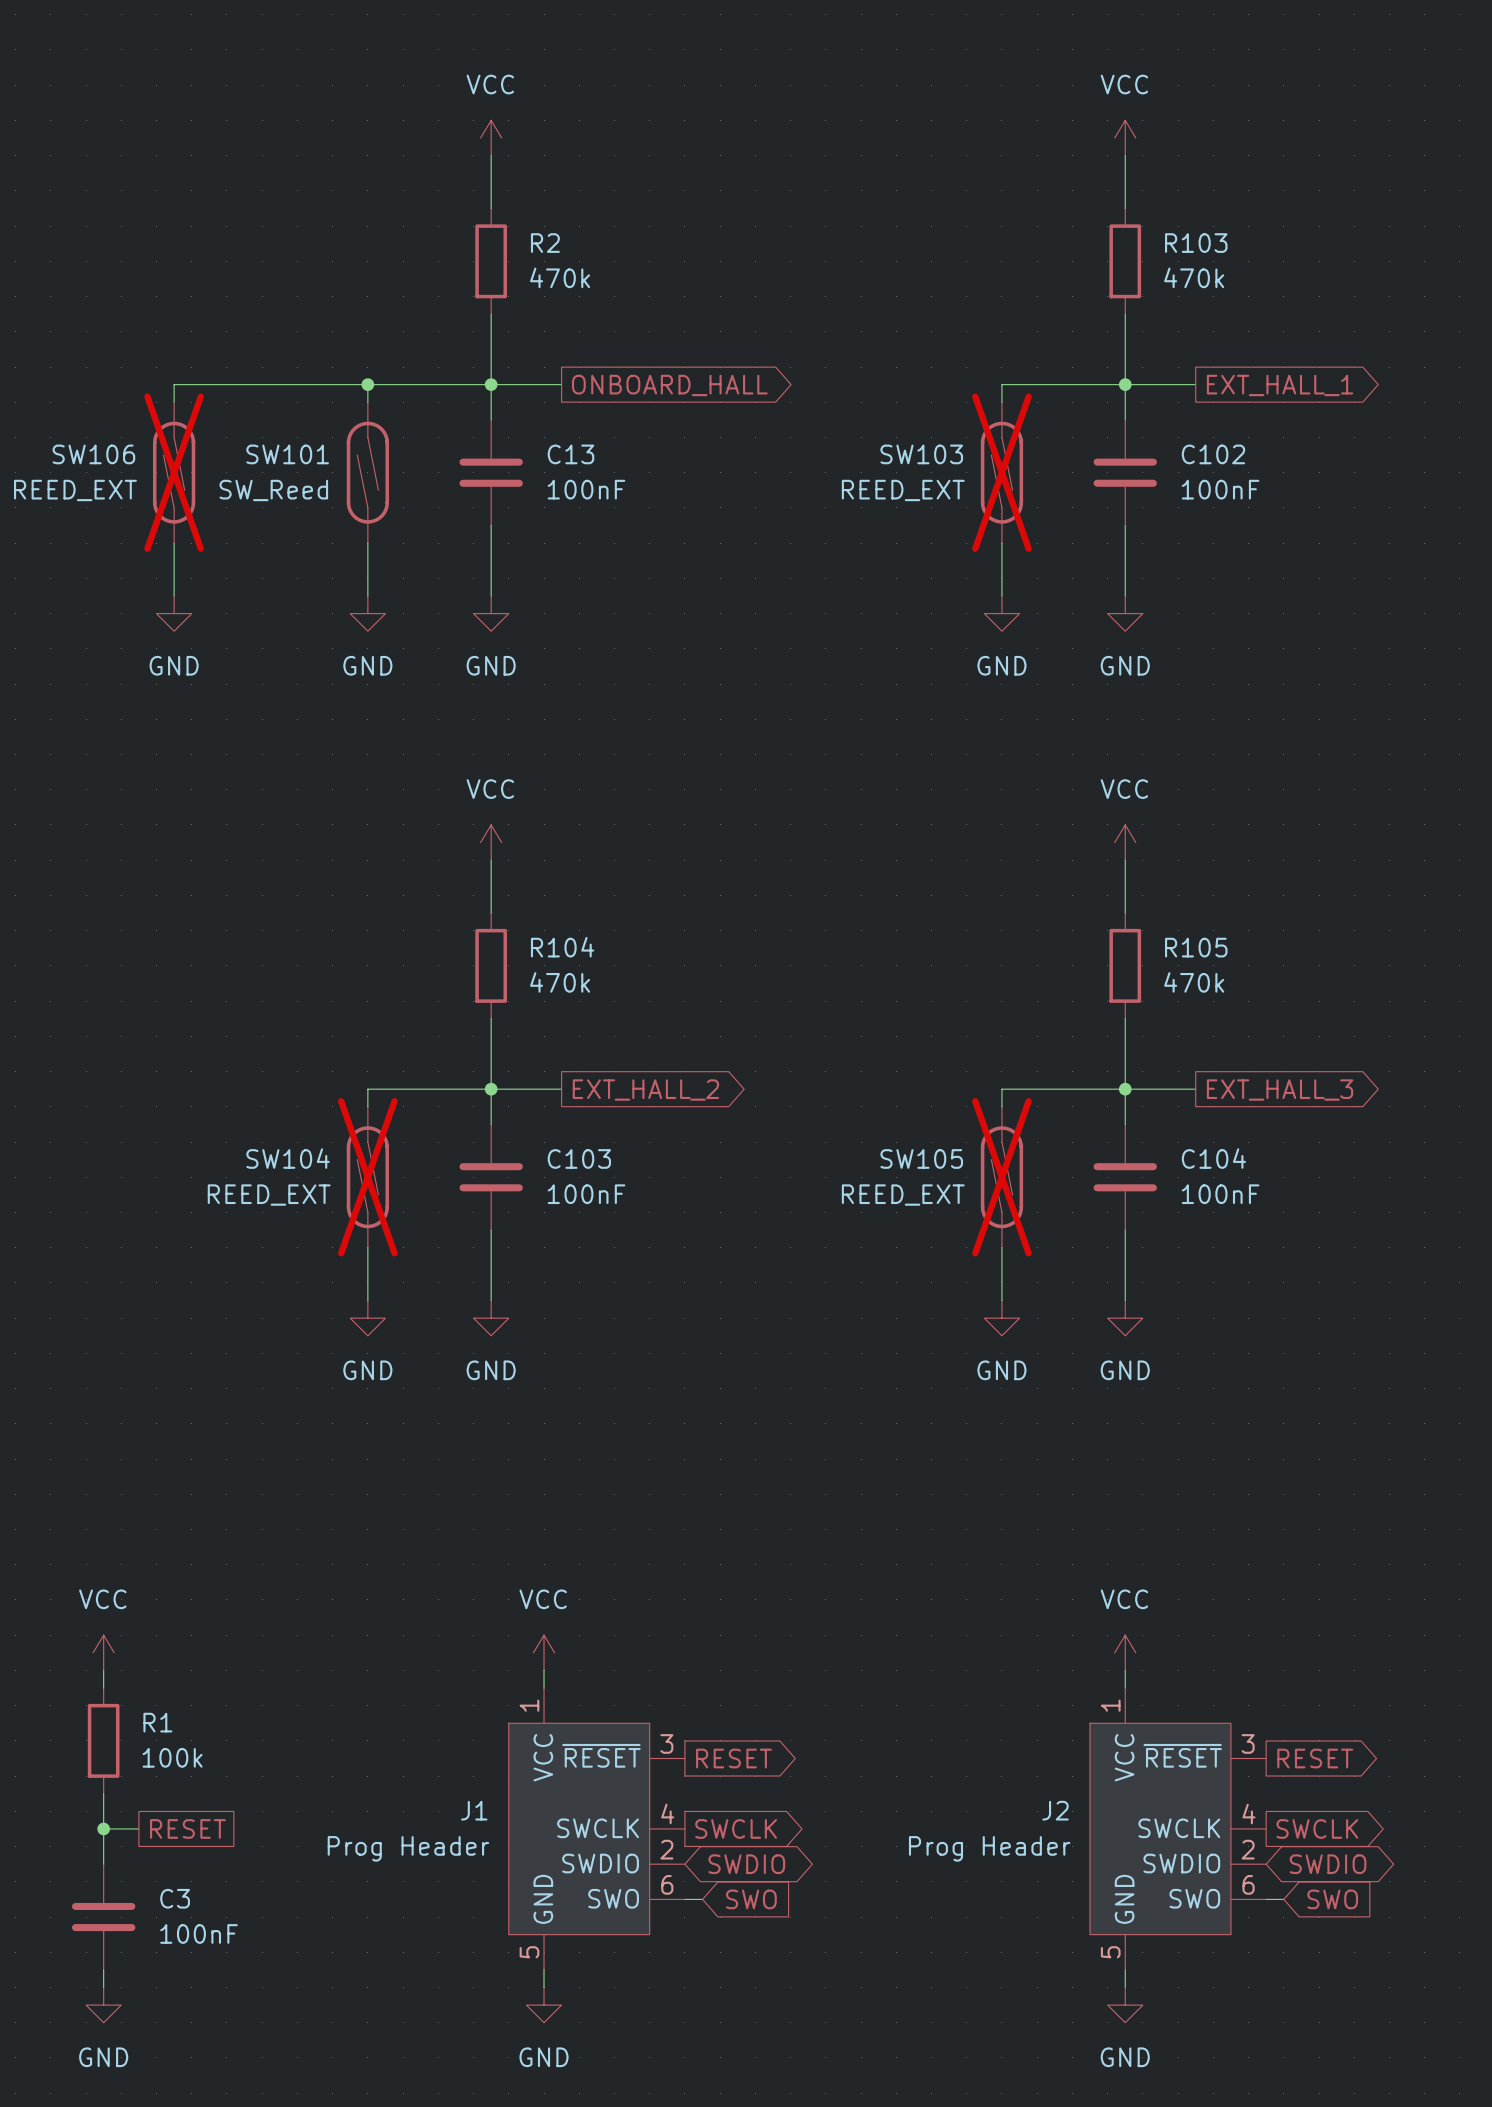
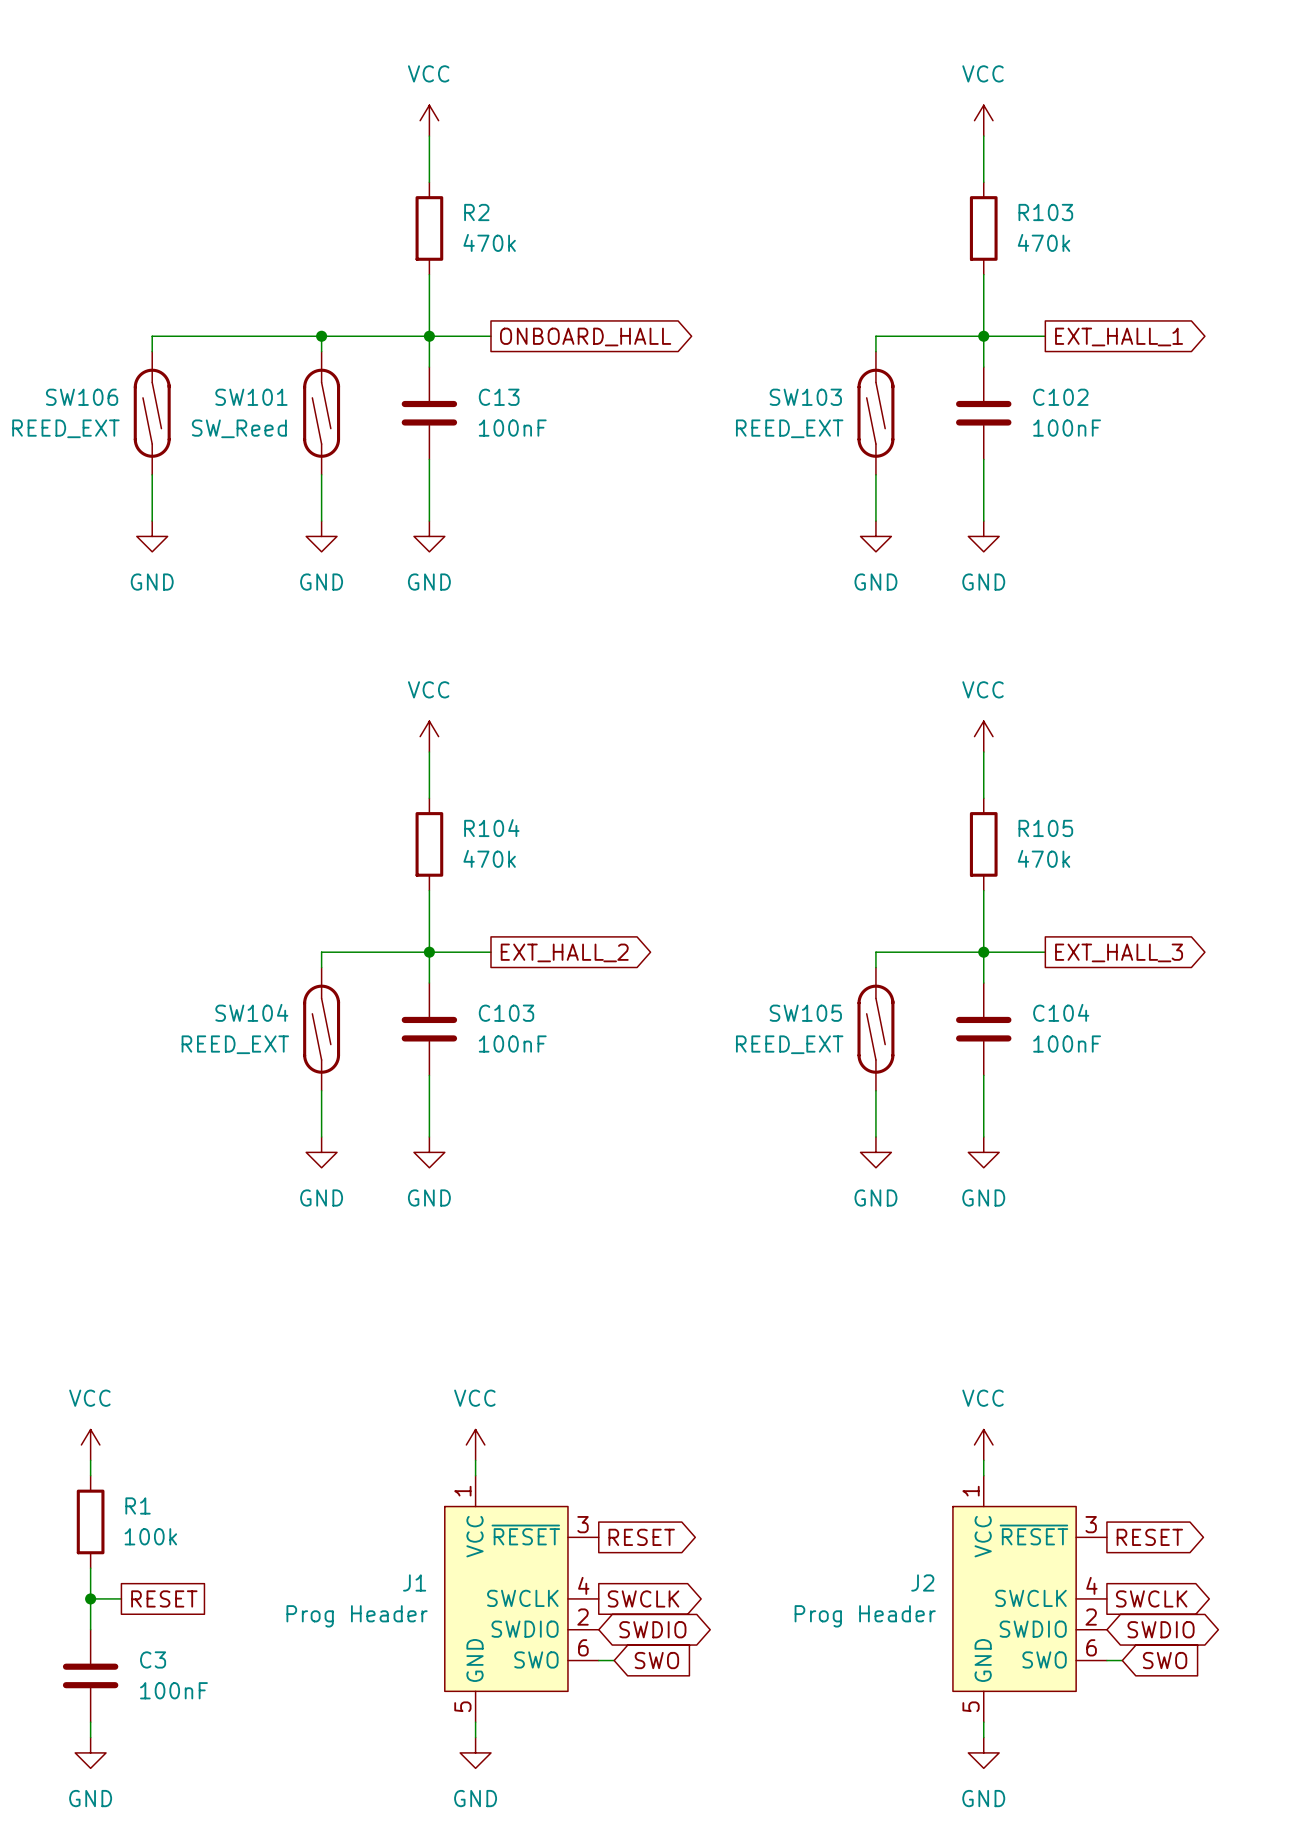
SW106 do-not-place cross: (174, 472) -> none
SW103 do-not-place cross: (1001, 472) -> none
SW104 do-not-place cross: (367, 1177) -> none
SW105 do-not-place cross: (1001, 1177) -> none

